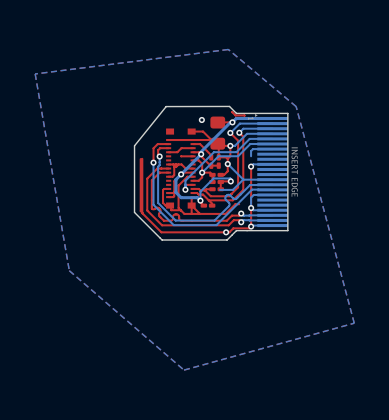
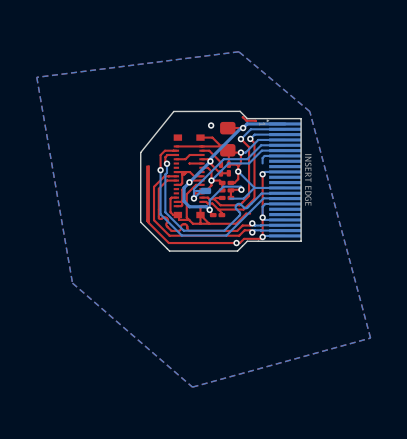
bottom track: none -> (205, 190) (195, 190)
part: none -> (205, 190)
bottom track: none -> (199, 192) (194, 198) (192, 196)

